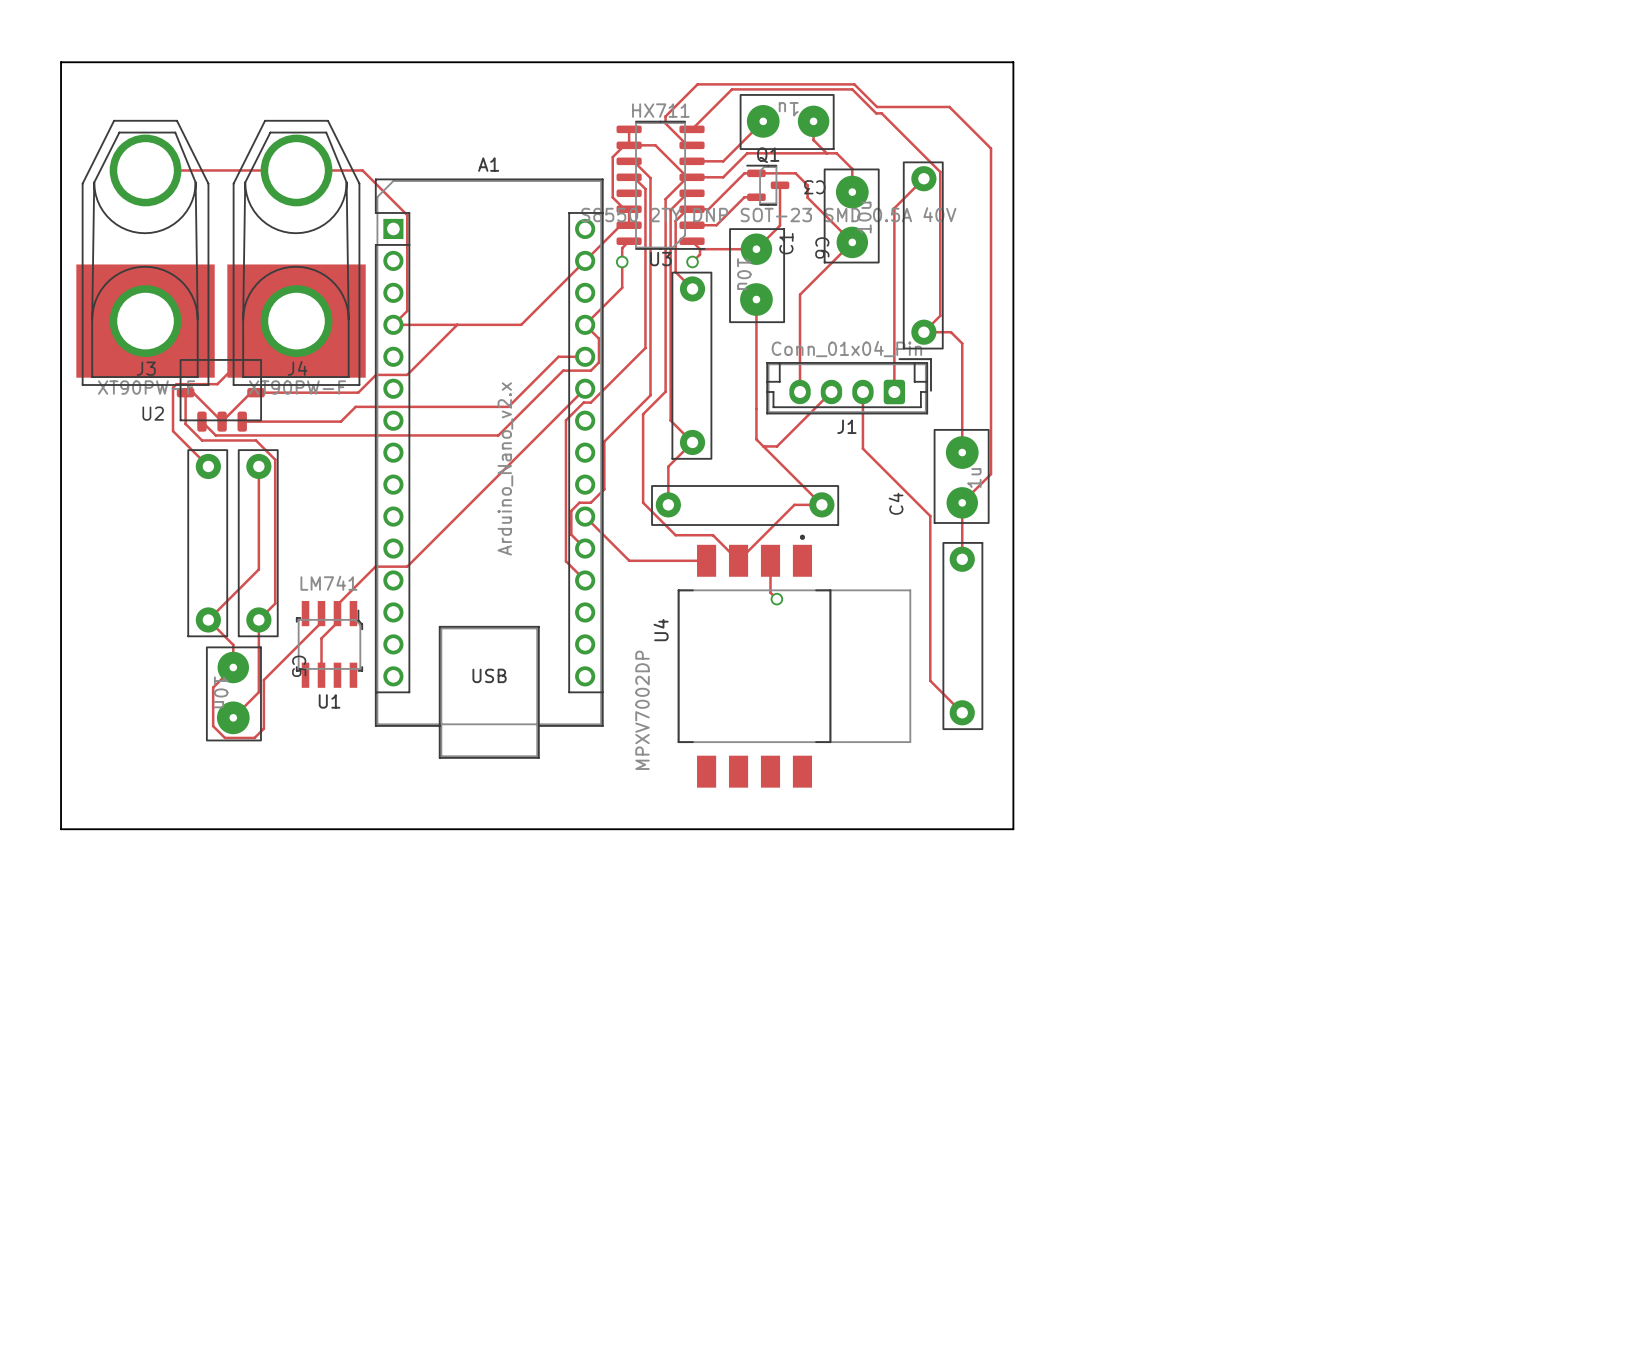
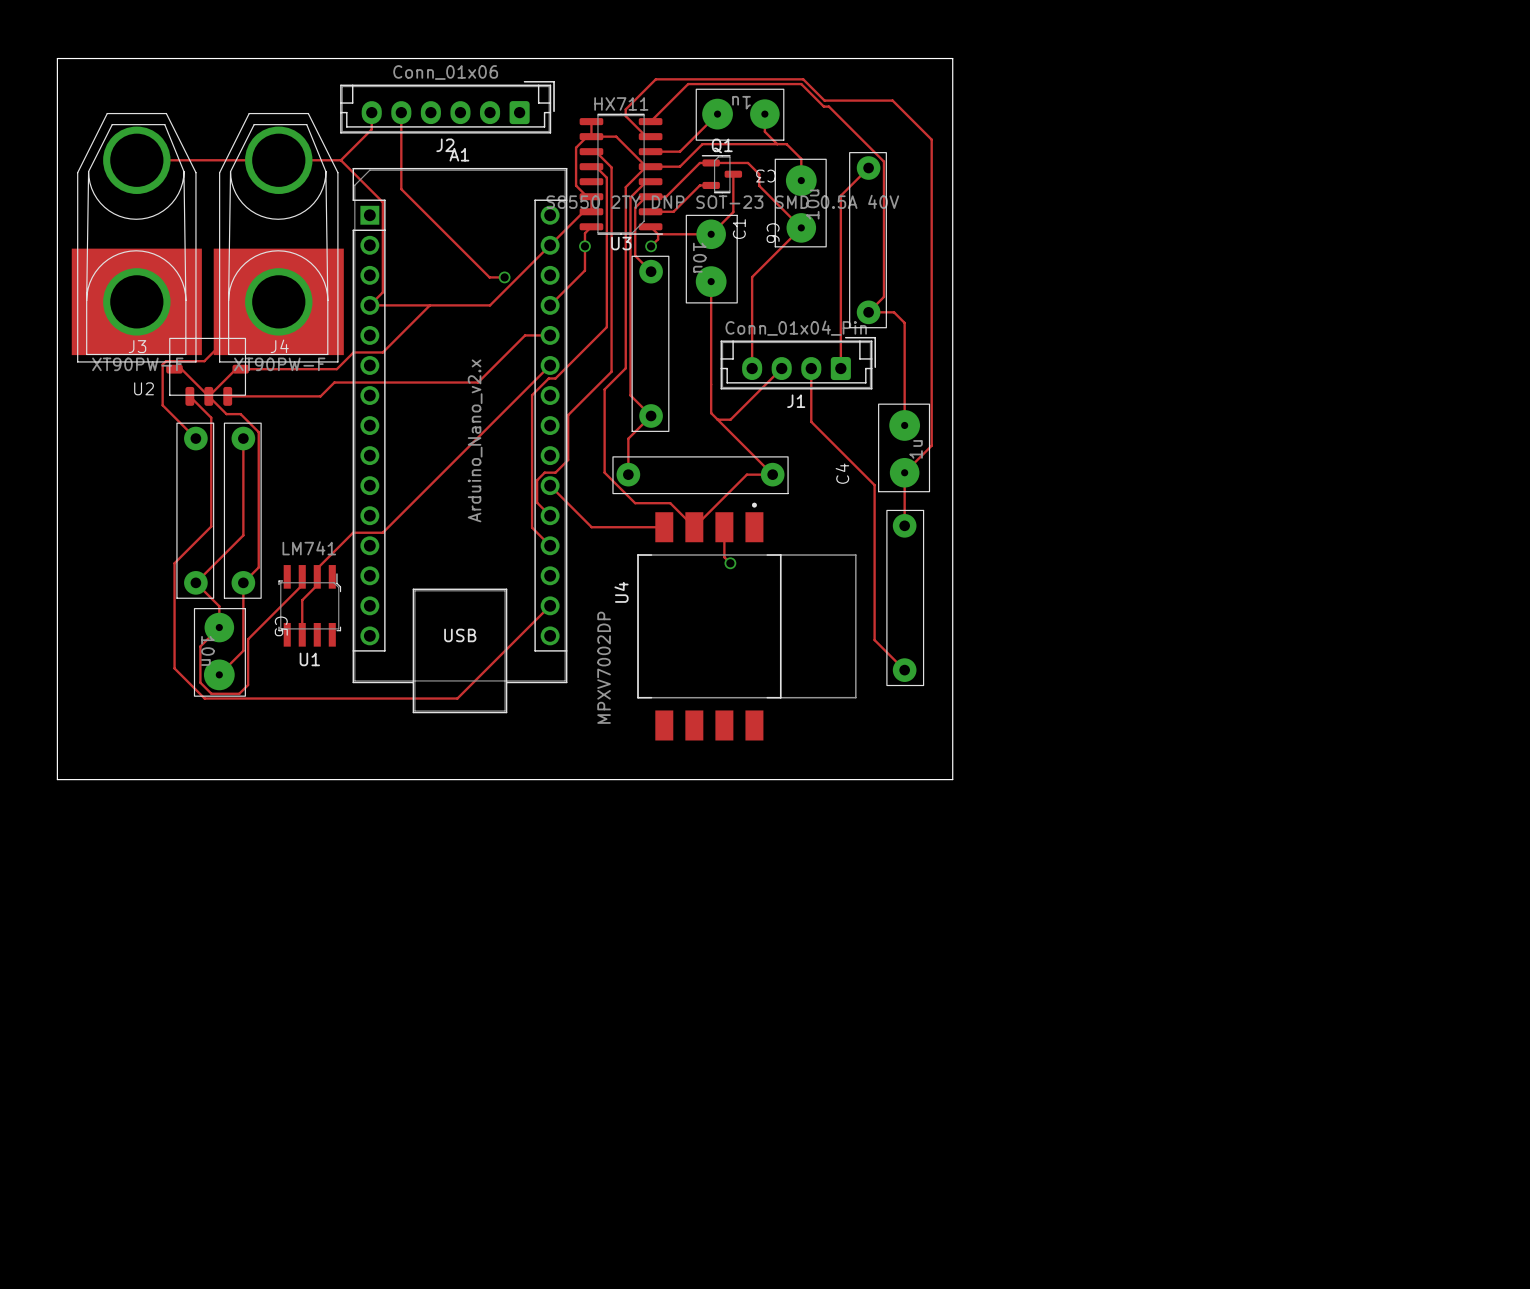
J2: none -> Conn_01x06 (447, 107)
track: none -> (371, 112) (371, 129) (340, 160)
track: none -> (401, 112) (401, 189) (489, 277) (504, 277)
via: none -> (504, 277)
track: (585, 324) (598, 338) (598, 362) (590, 370) (563, 370) (498, 435) (215, 435) -> (550, 605) (457, 698) (204, 698) (174, 668) (174, 563) (211, 526) (211, 417) (202, 409)
track: (185, 392) (185, 423) (202, 440) (240, 440) -> (208, 396) (226, 414)

